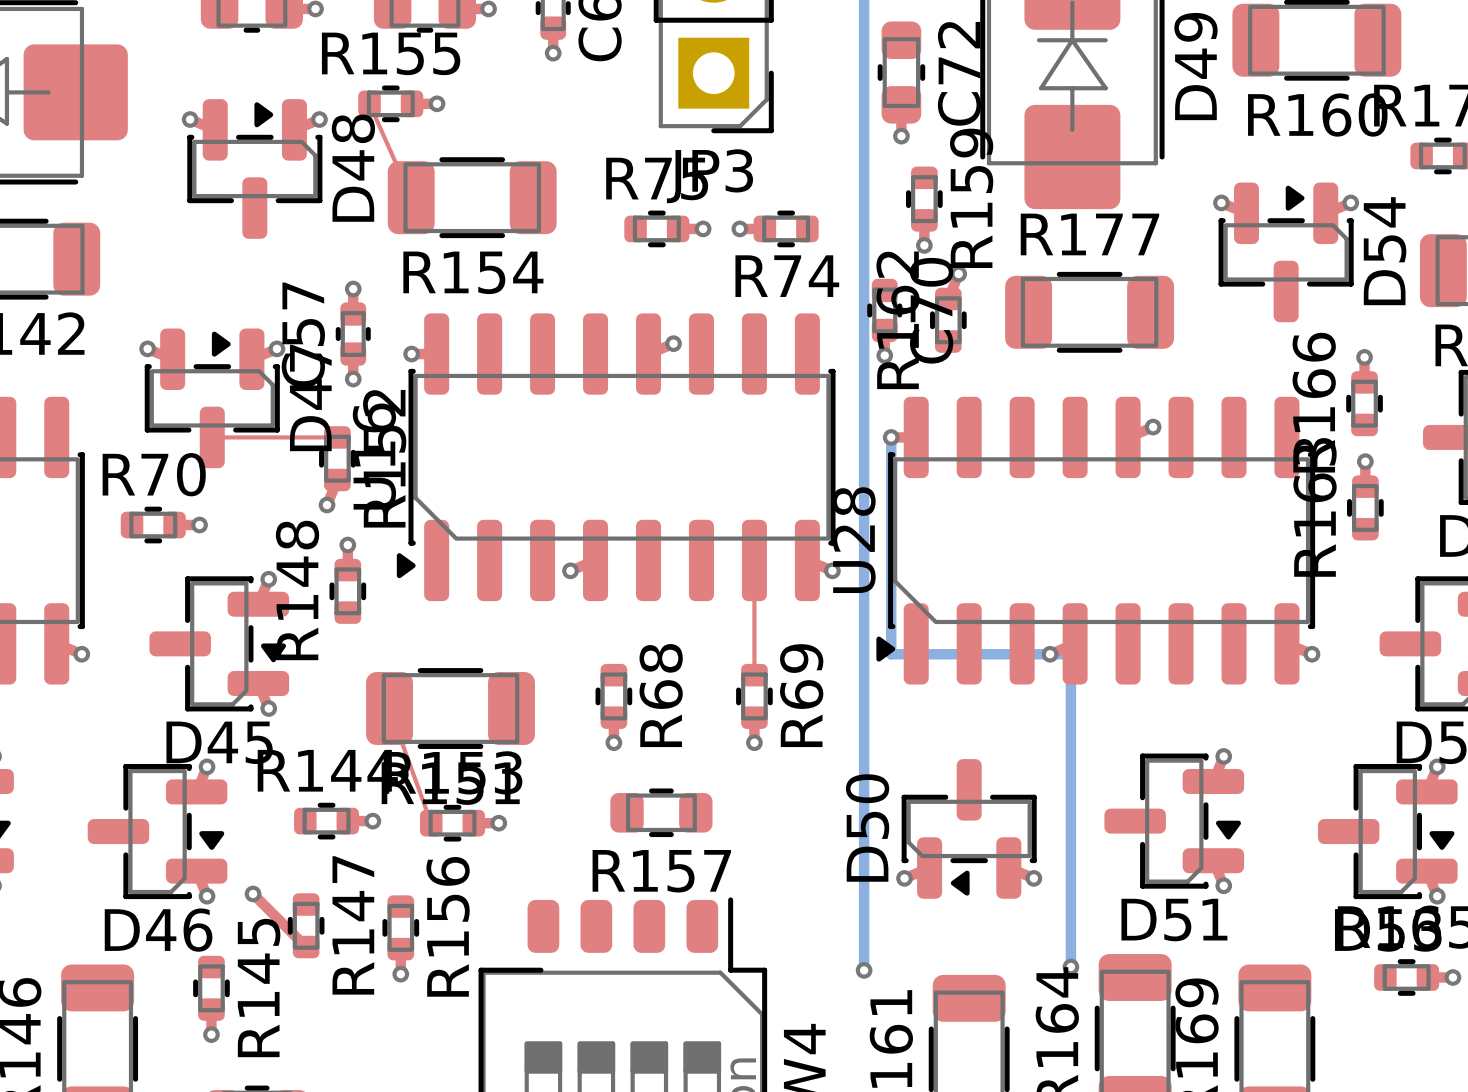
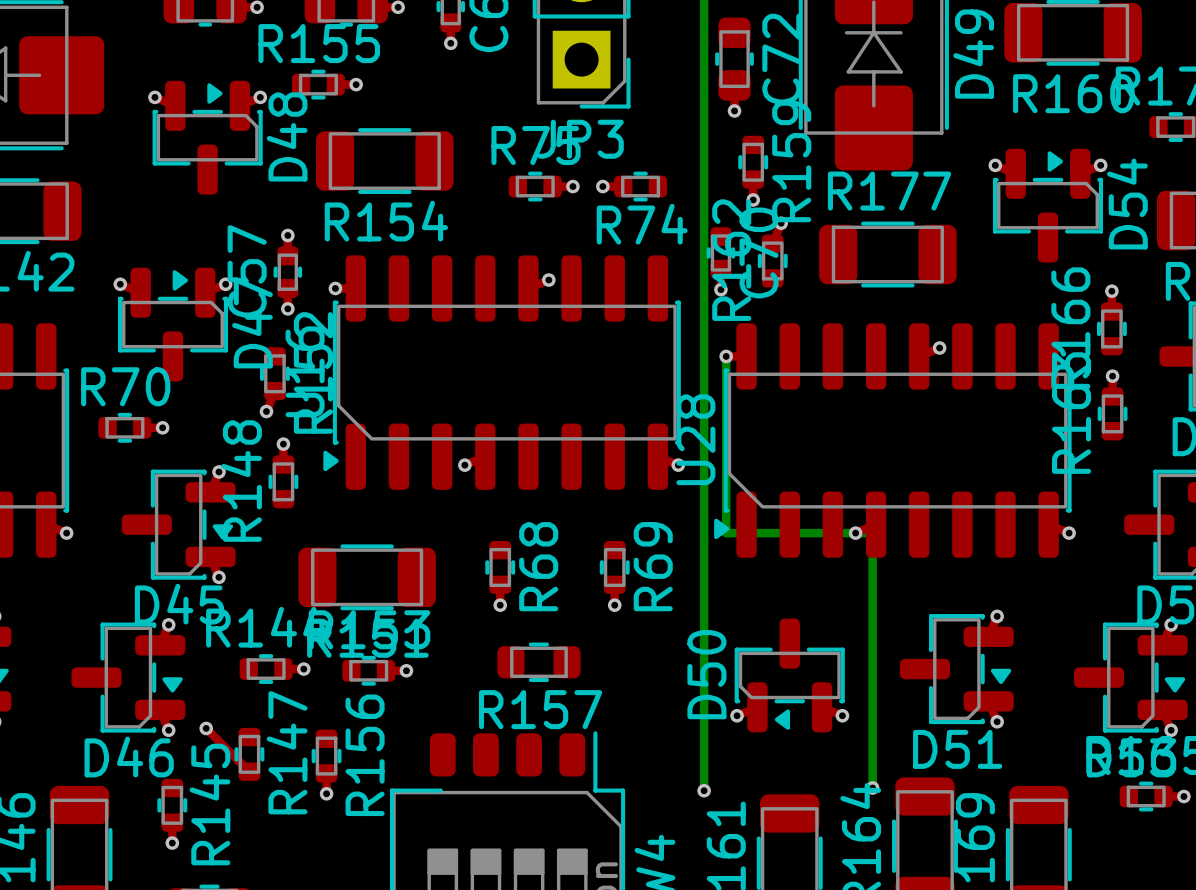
top track: (369, 103) (411, 197) -> none
top track: (212, 437) (337, 437) -> none
top track: (754, 560) (754, 675) -> none
top track: (389, 708) (431, 823) -> none

